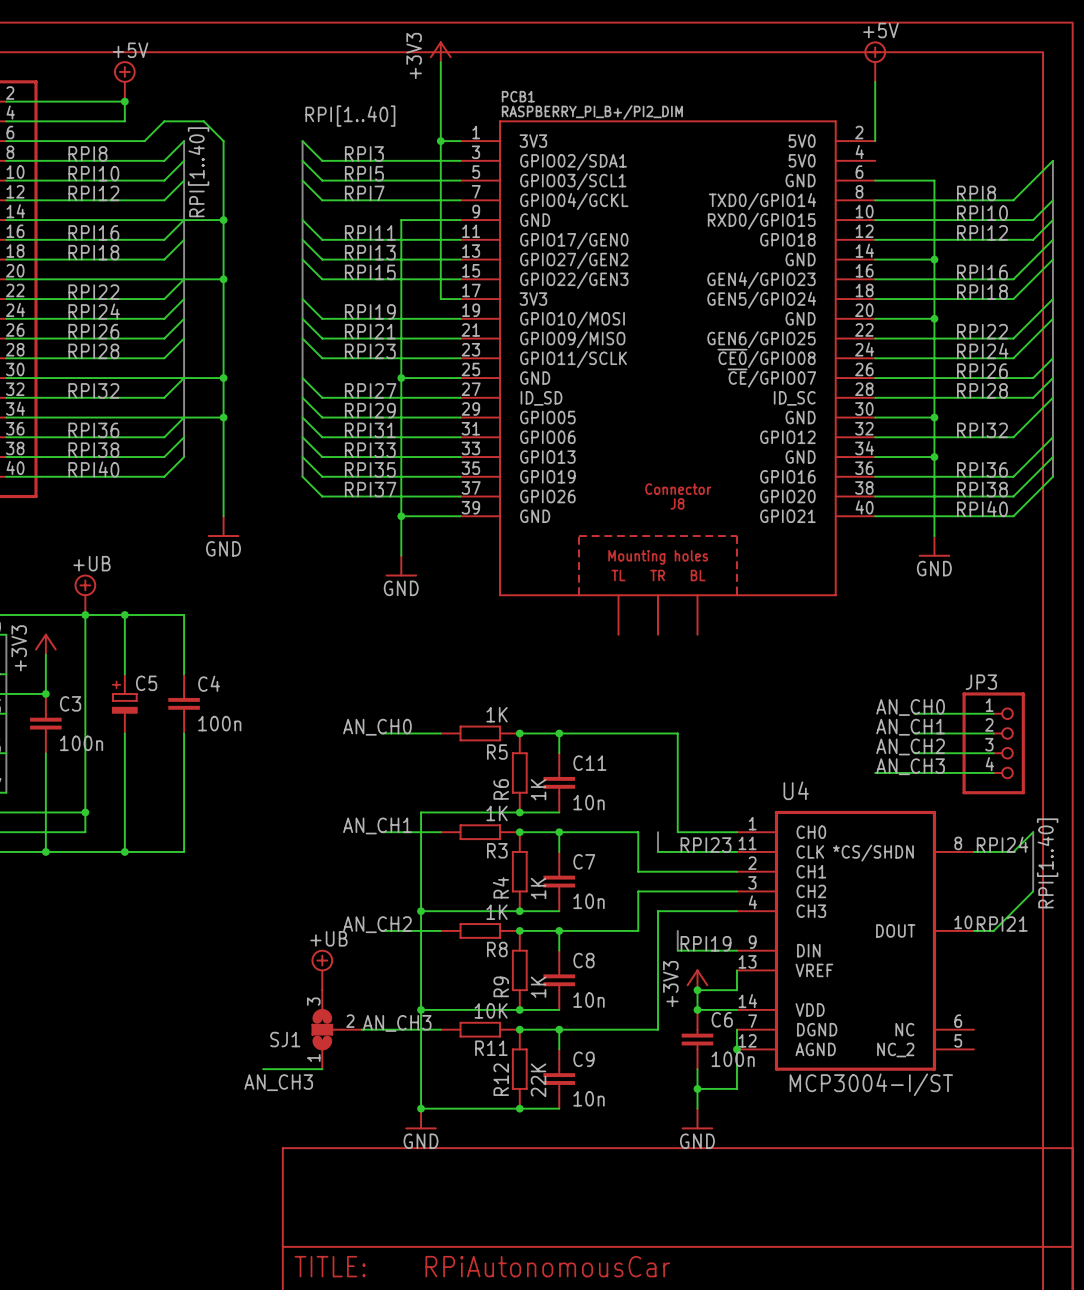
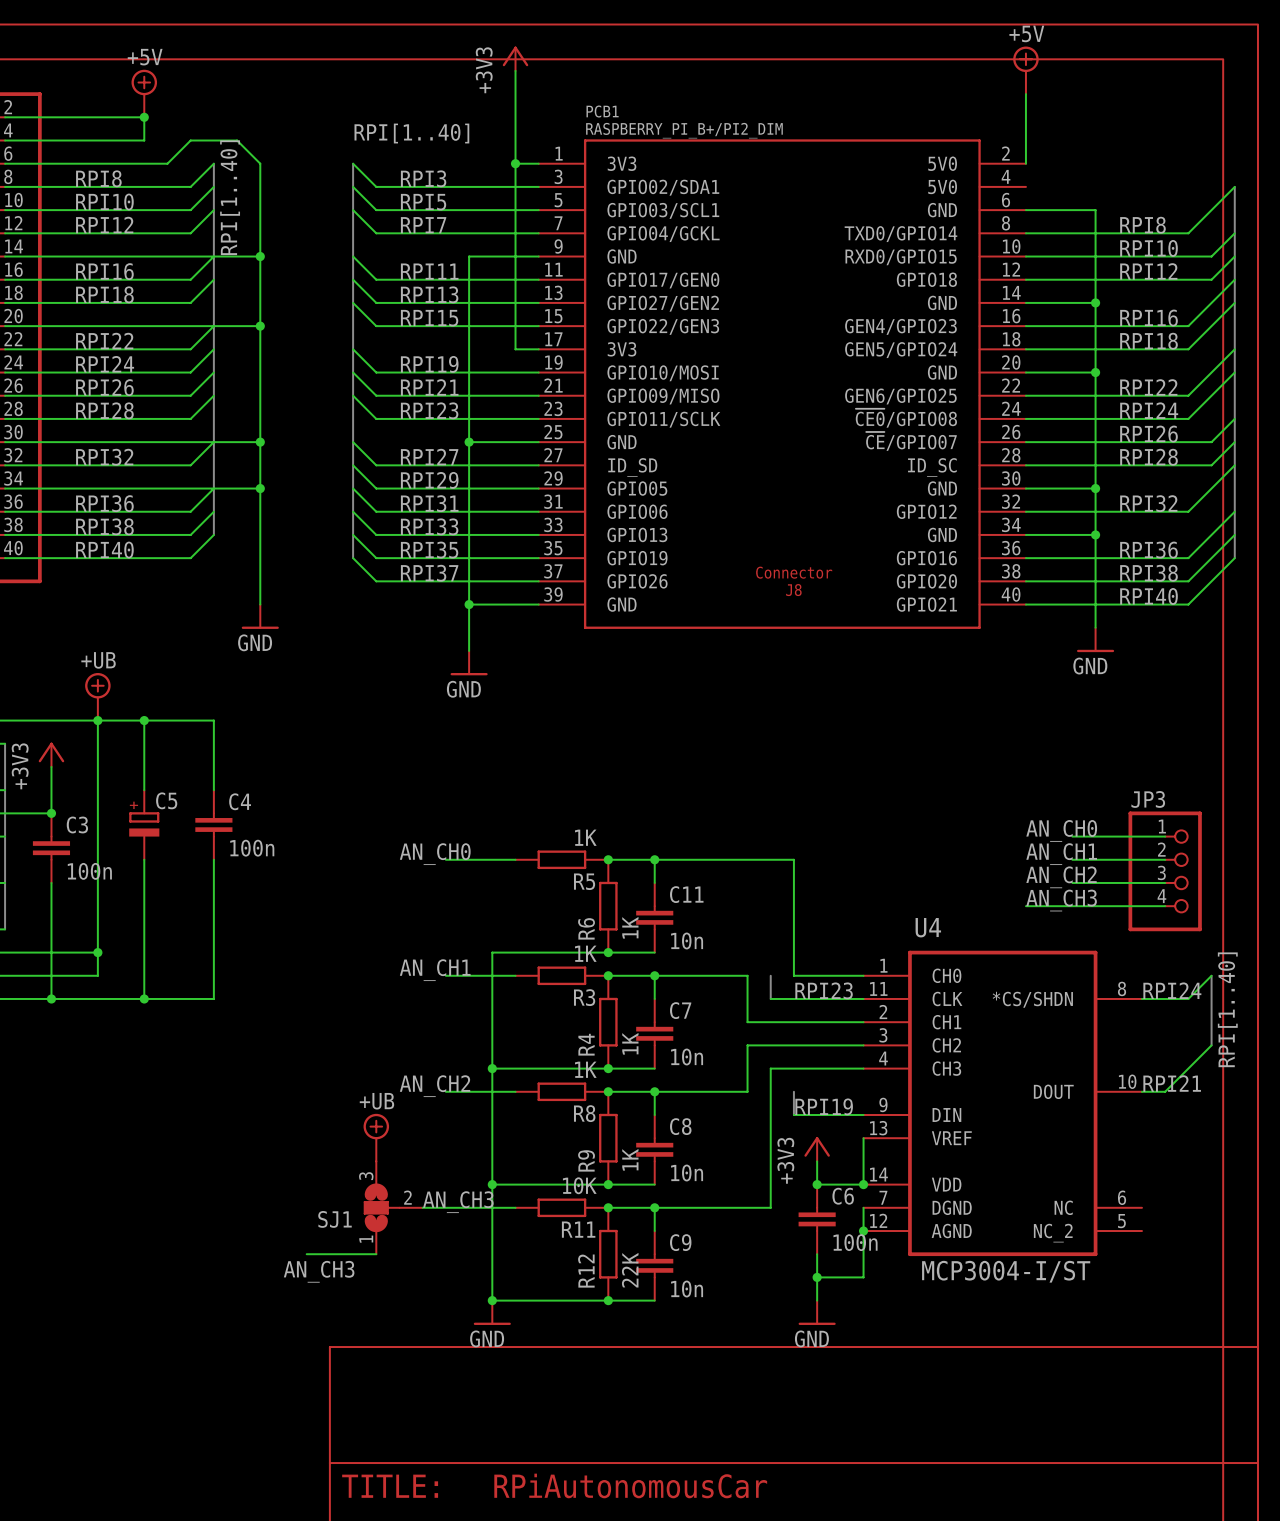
PCB1 symbol: [460, 120, 876, 635] -> [538, 139, 1026, 629]
wire: (697, 990) (736, 990) -> (863, 1184) (863, 1161)
junction position: (697, 990) -> (863, 1184)

